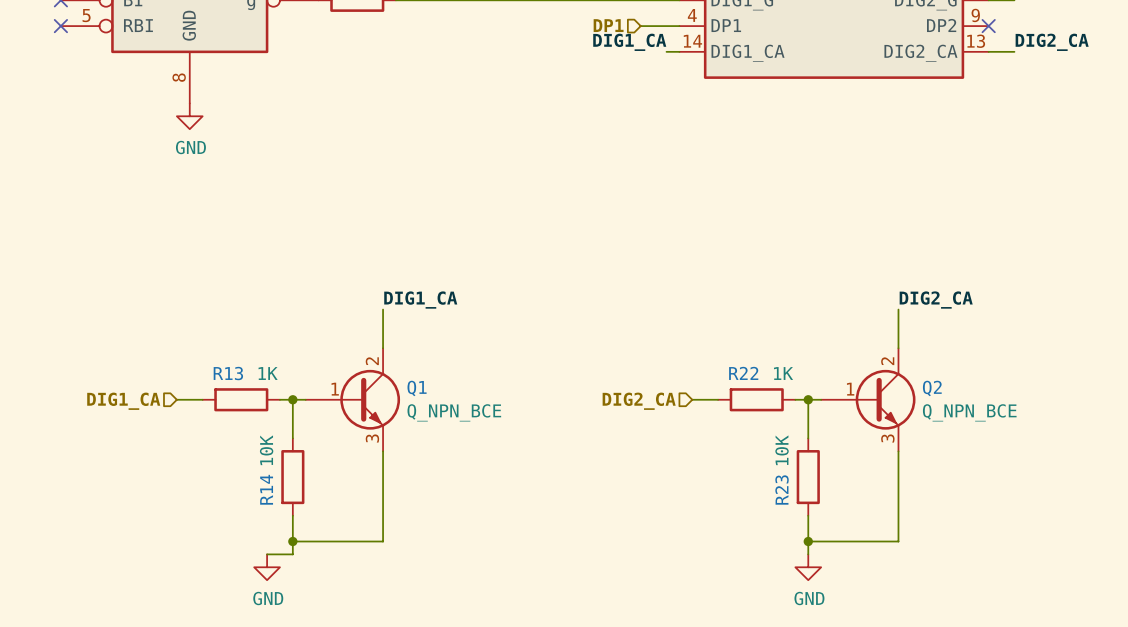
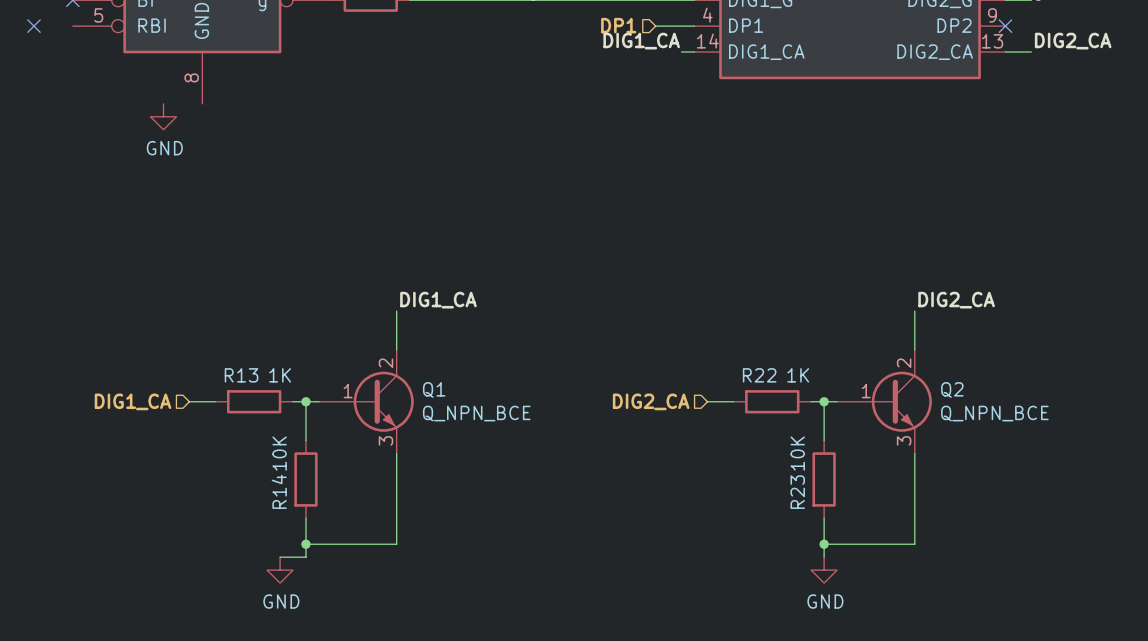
no-connect mark: none -> (33, 26)
no-connect mark: (60, 26) -> none
power symbol position: GND (189, 116) -> GND (163, 116)

